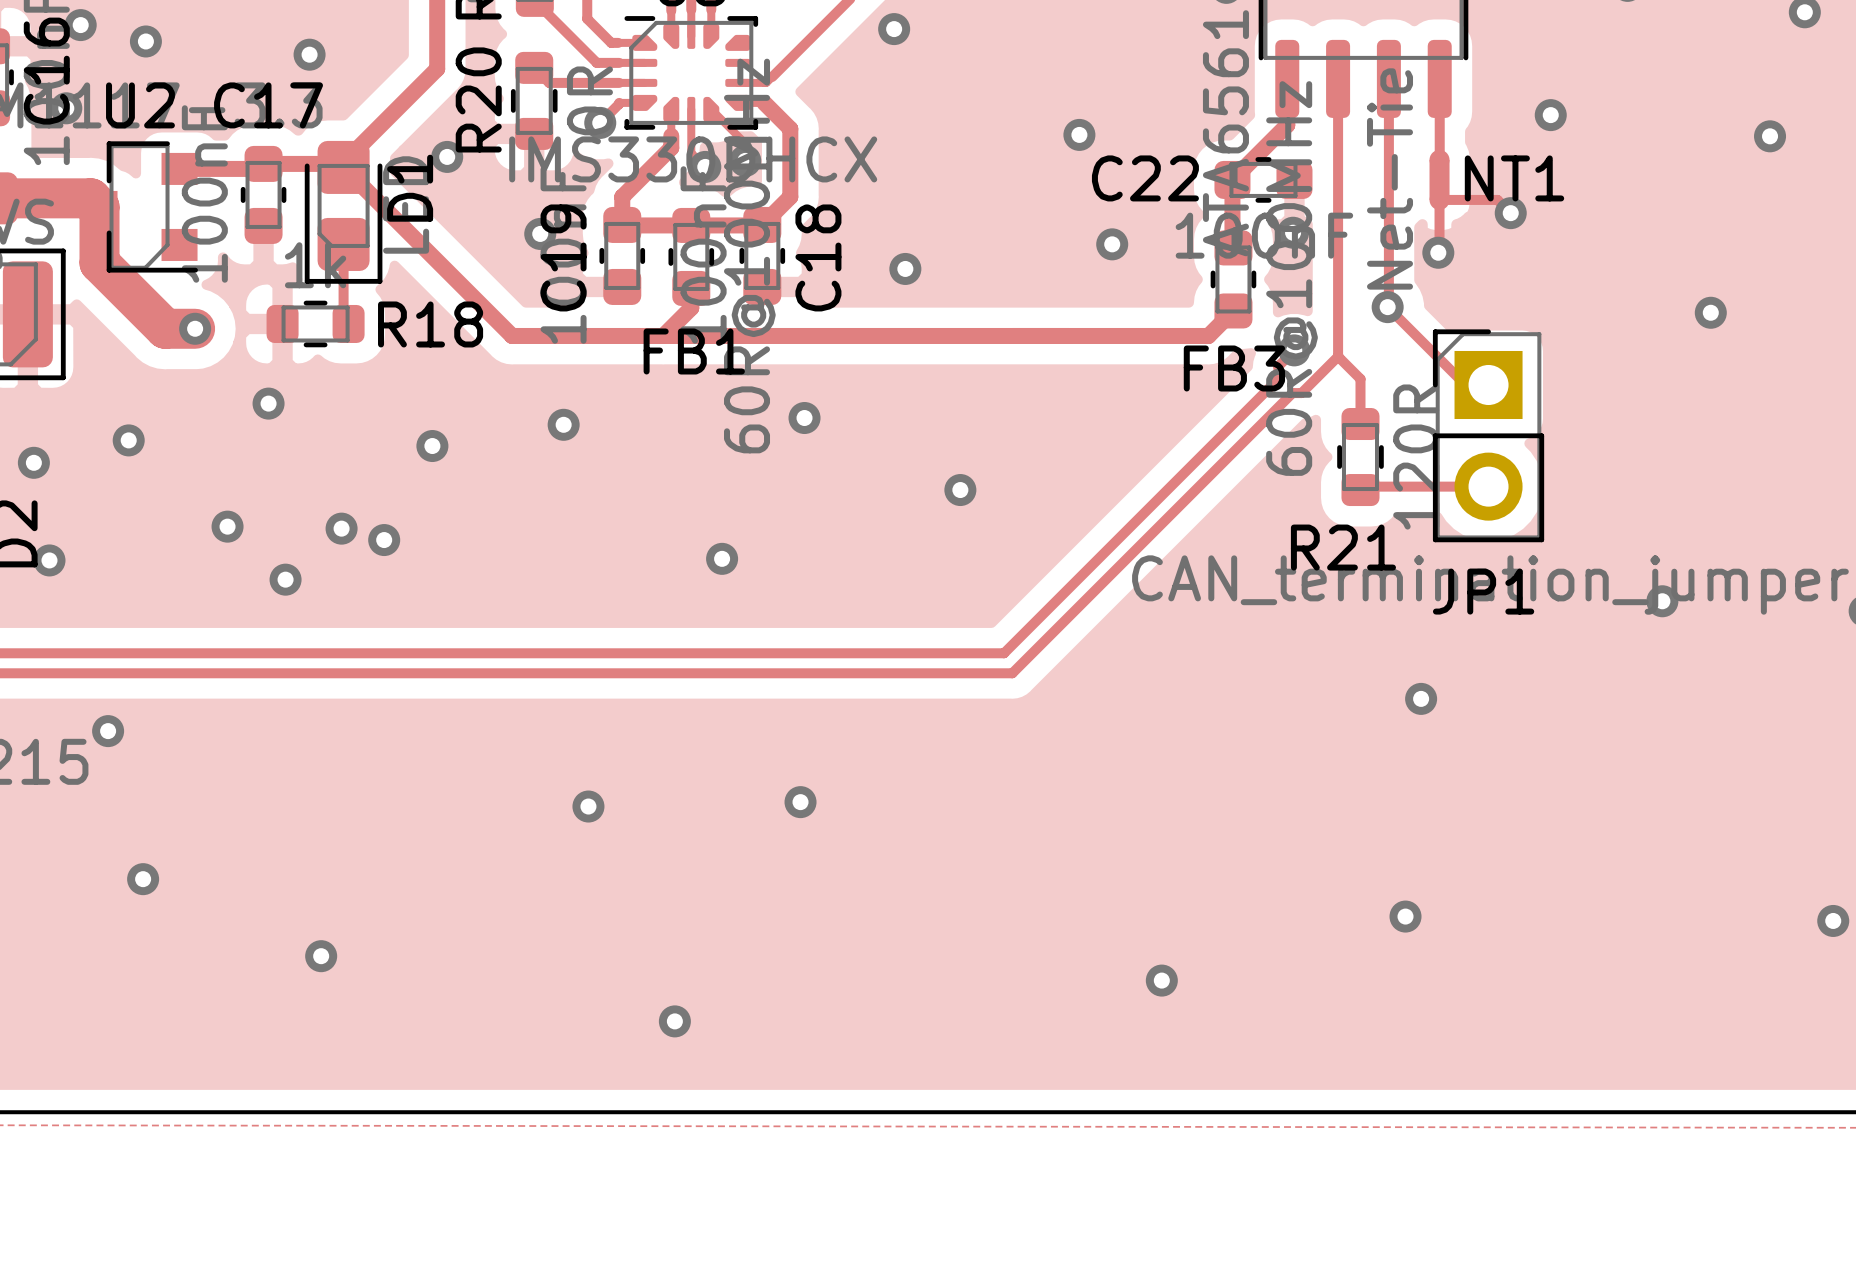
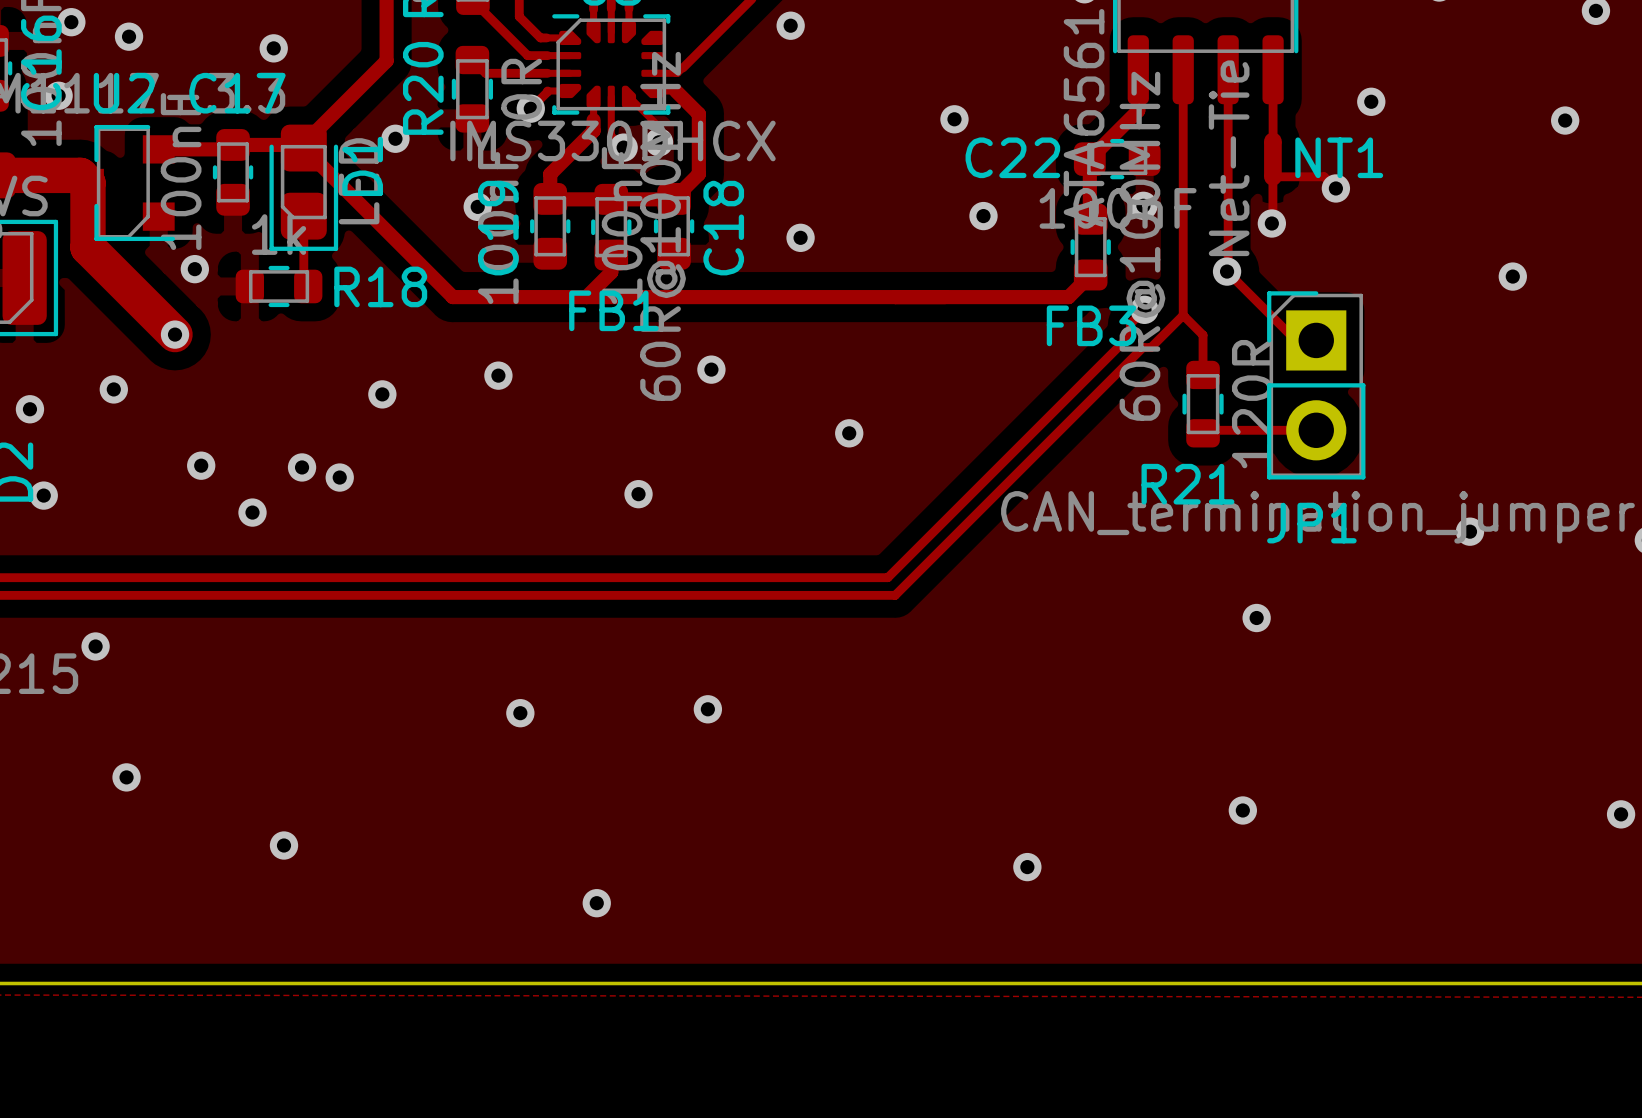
track: (99, 262) (165, 328) (195, 328) -> (87, 232) (87, 247) (175, 334)
via position: (195, 328) -> (194, 269)
via: none -> (175, 334)
via: (268, 403) -> none

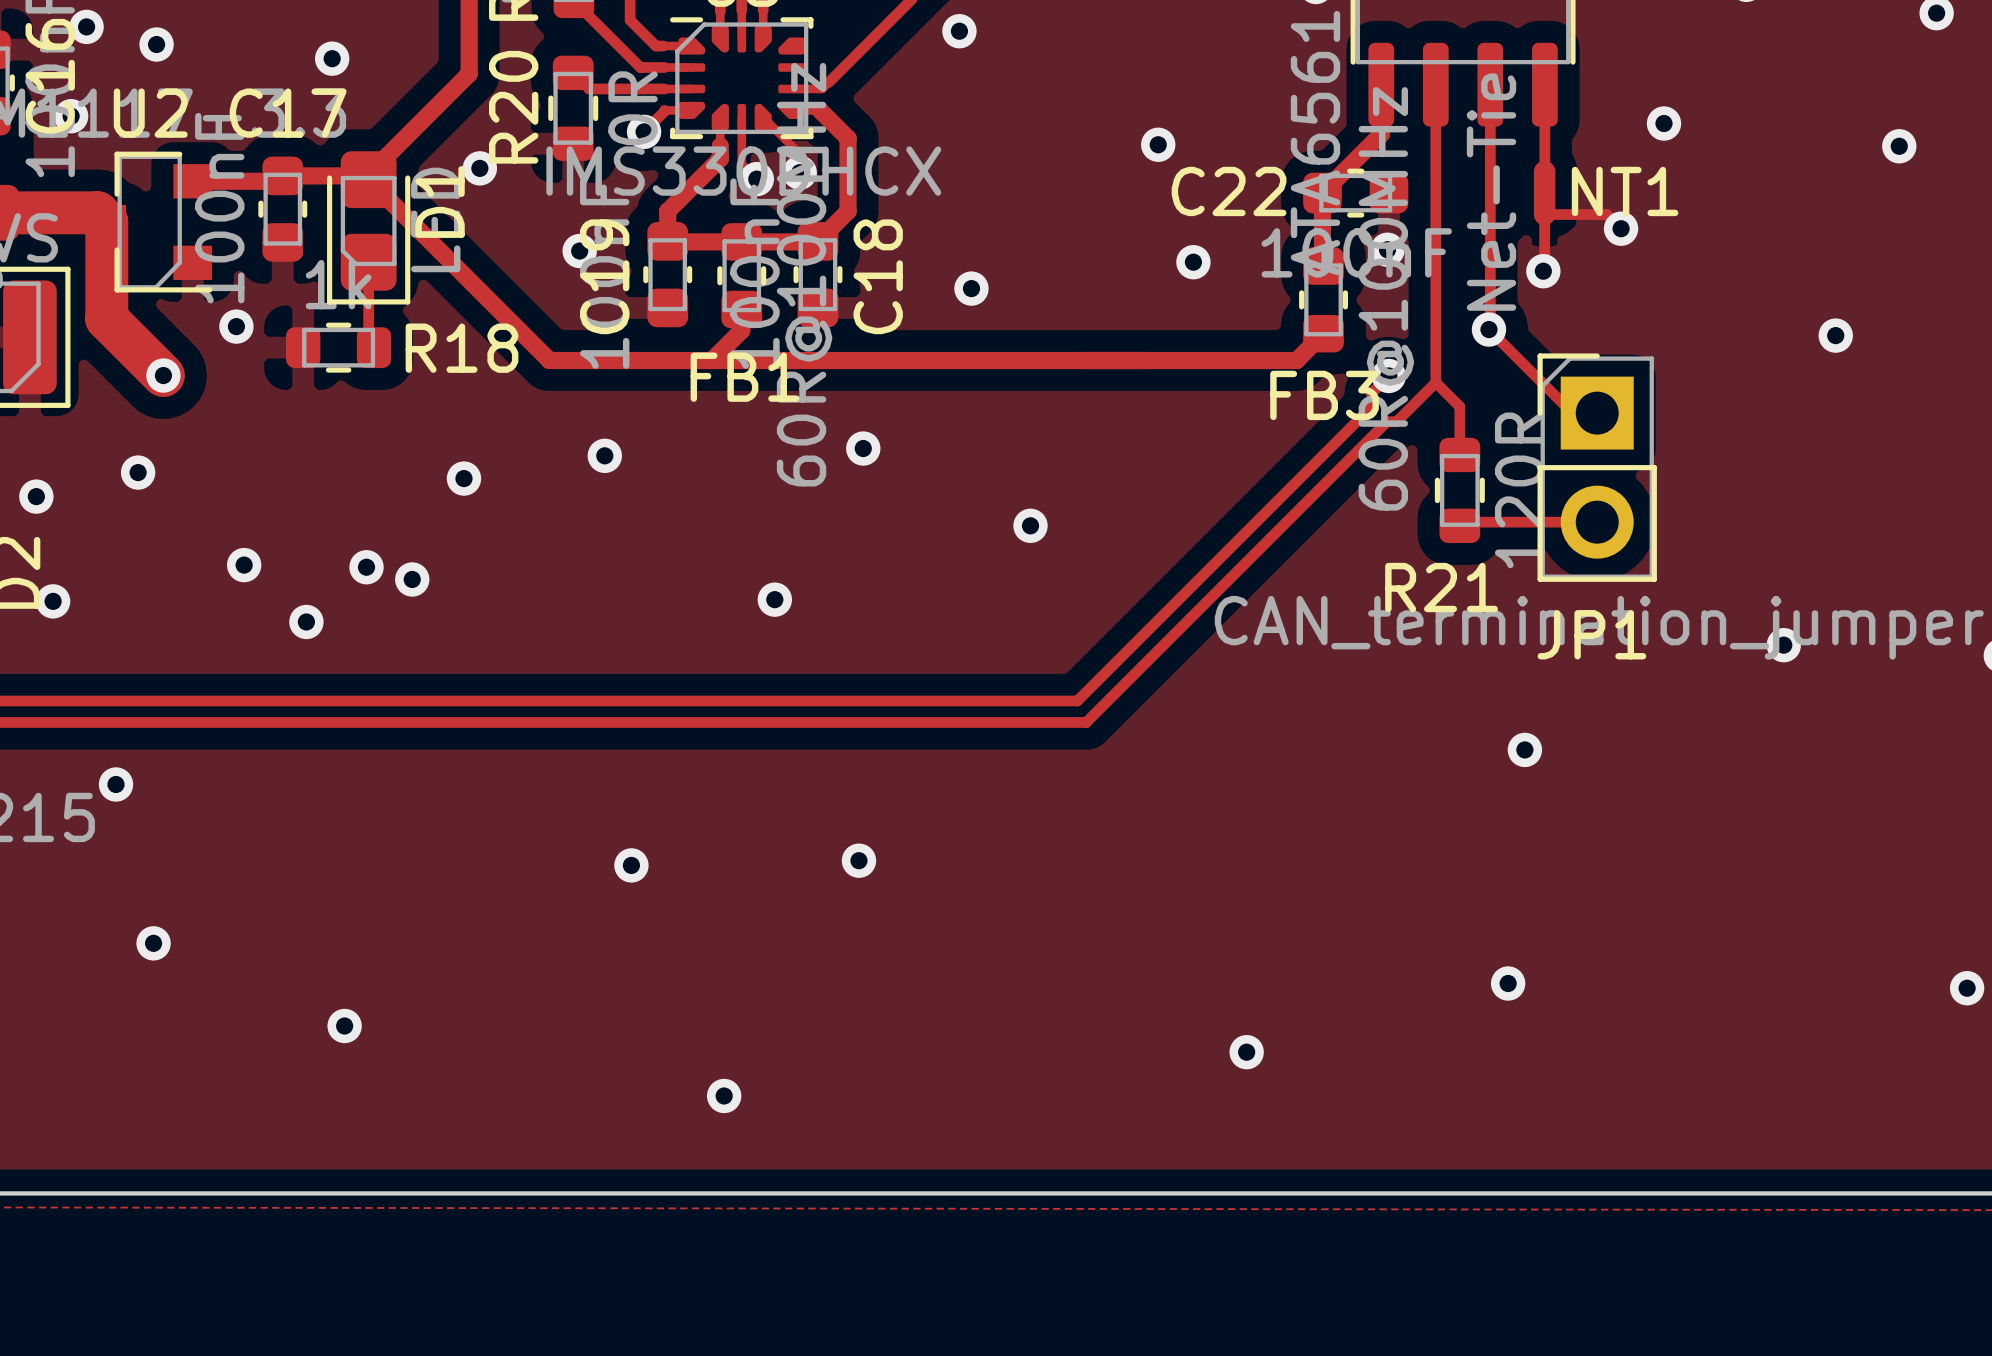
track: (87, 247) (175, 334) -> (106, 300) (106, 318) (163, 375)
via position: (175, 334) -> (163, 375)

